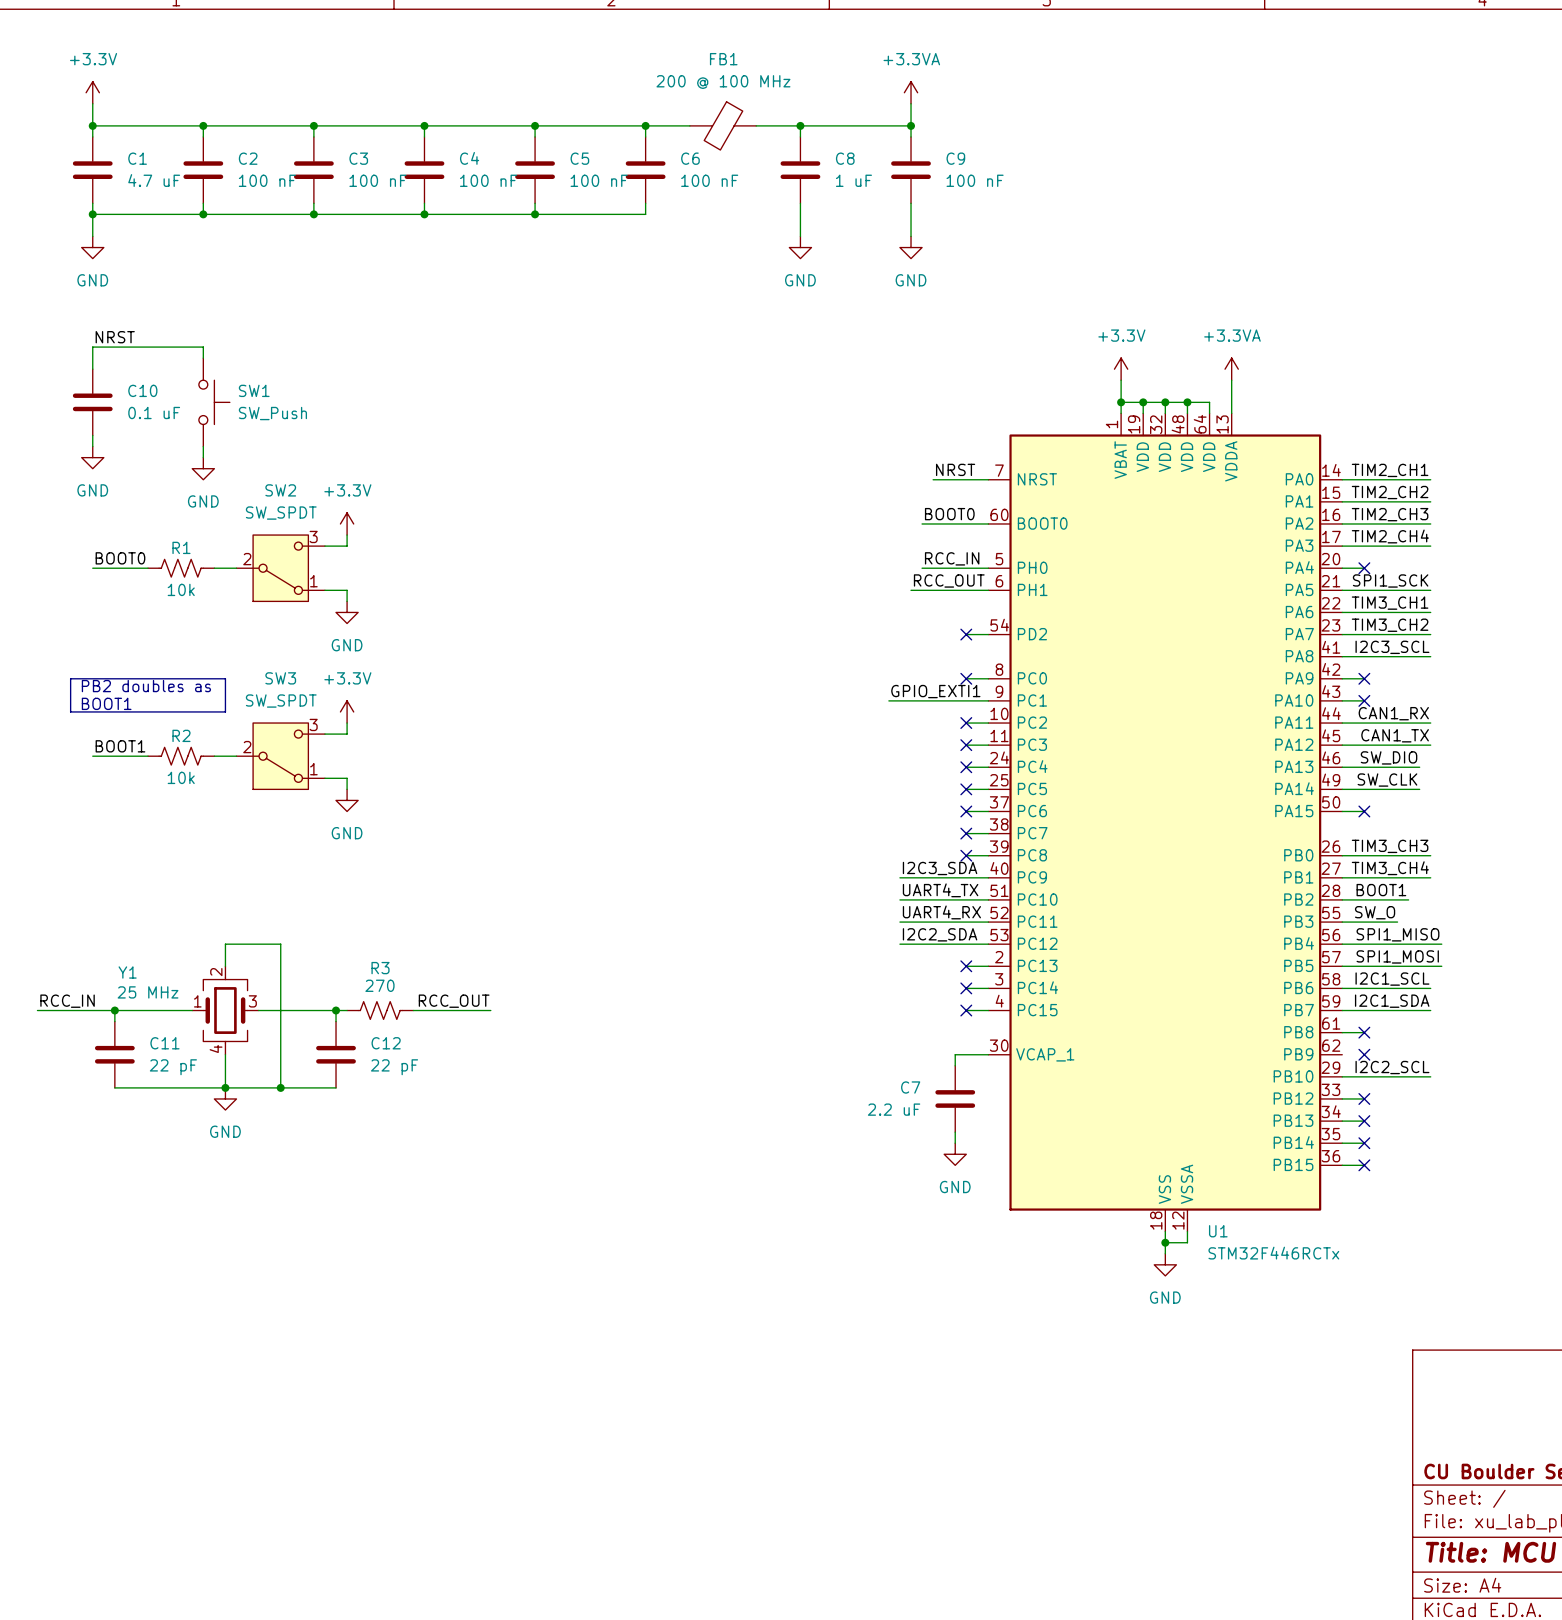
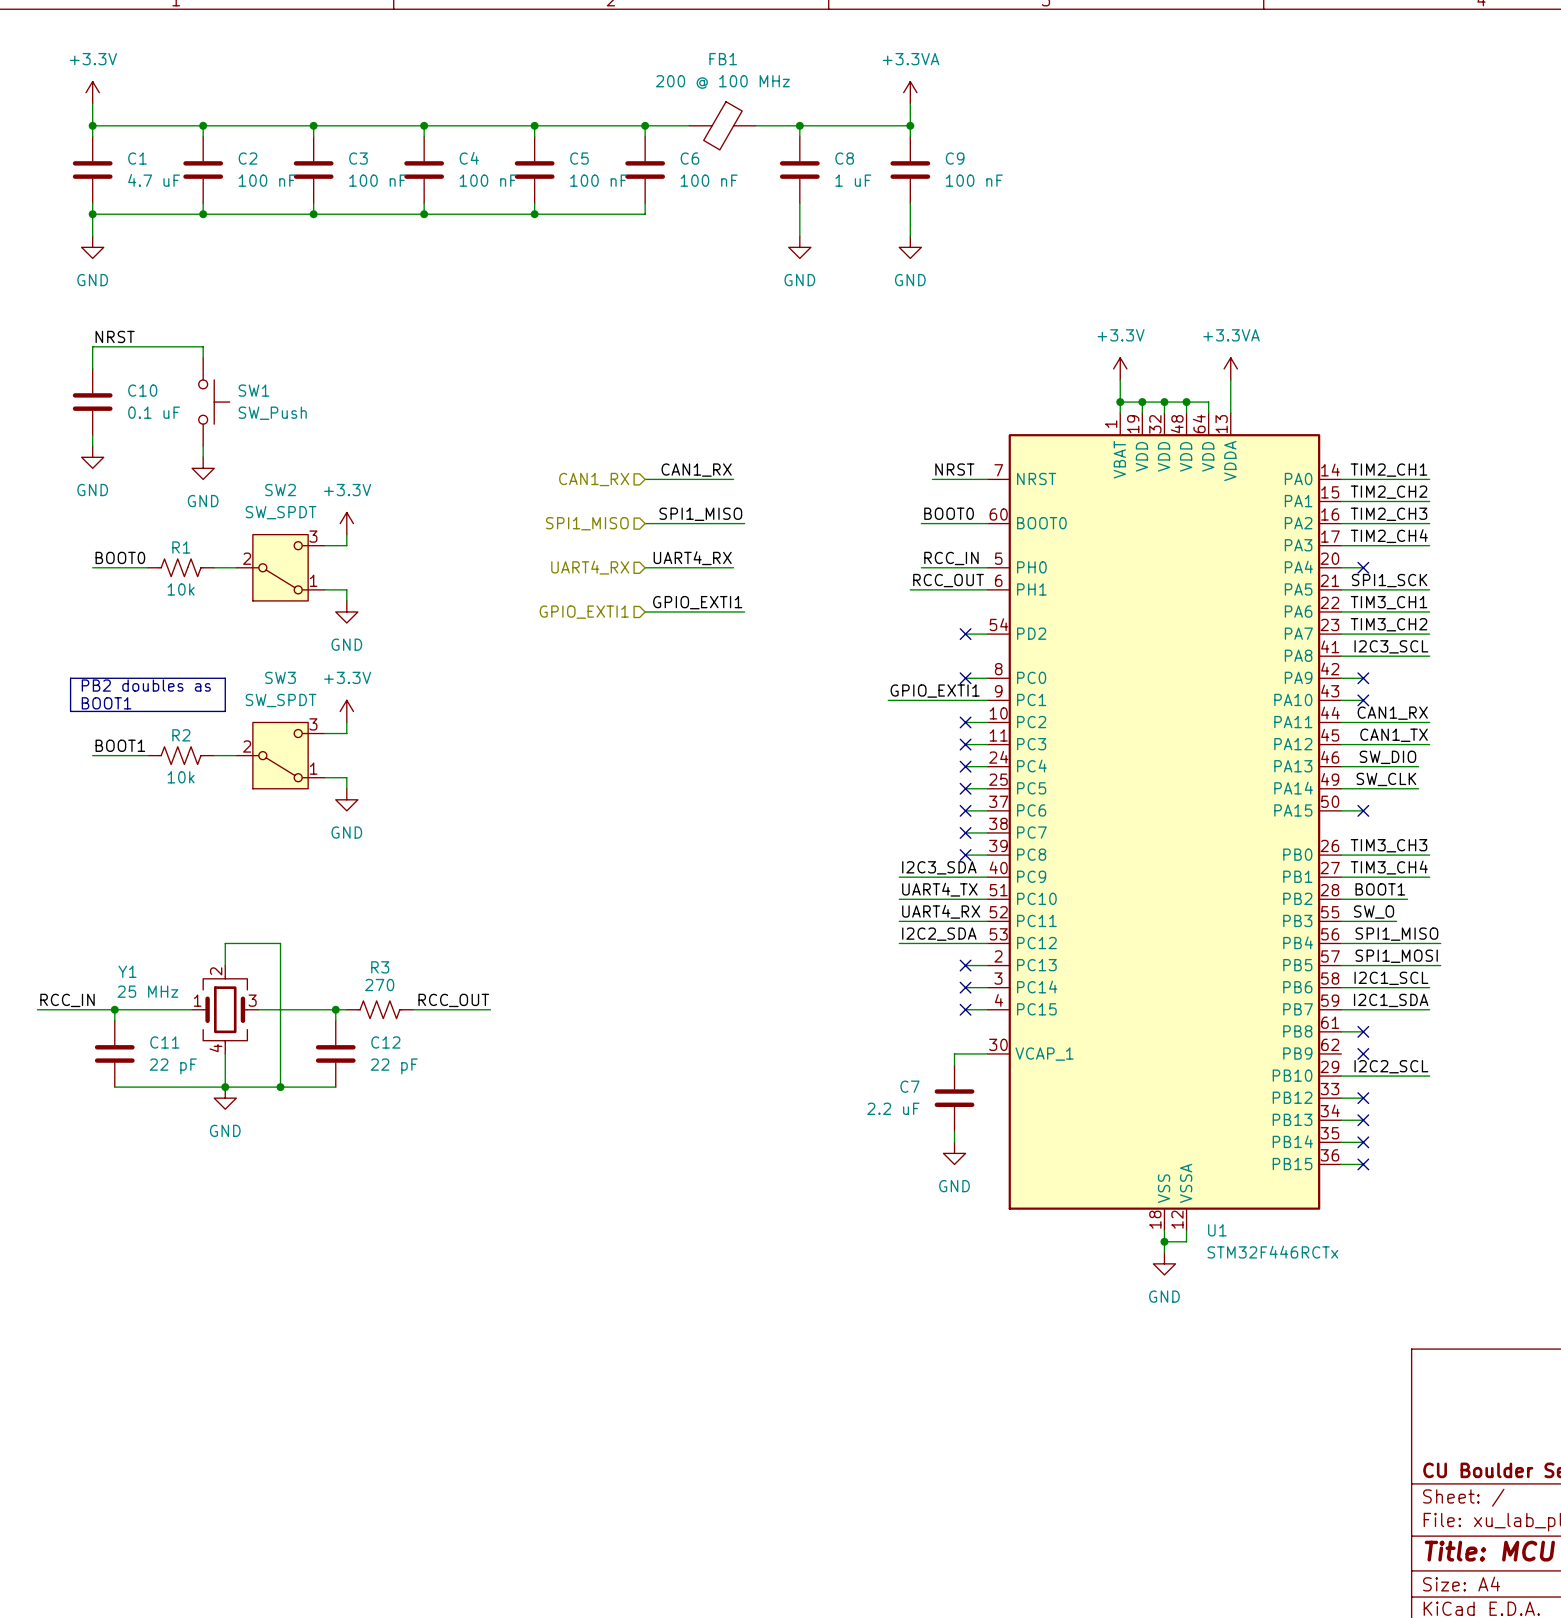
label: none -> CAN1_RX (696, 470)
hierarchical label: none -> CAN1_RX (594, 479)
wire: none -> (645, 479) (733, 479)
label: none -> SPI1_MISO (700, 514)
wire: none -> (645, 523) (744, 523)
hierarchical label: none -> SPI1_MISO (587, 523)
label: none -> UART4_RX (692, 558)
hierarchical label: none -> UART4_RX (590, 567)
wire: none -> (645, 567) (733, 567)
label: none -> GPIO_EXTI1 (697, 602)
hierarchical label: none -> GPIO_EXTI1 (584, 612)
wire: none -> (645, 611) (744, 611)

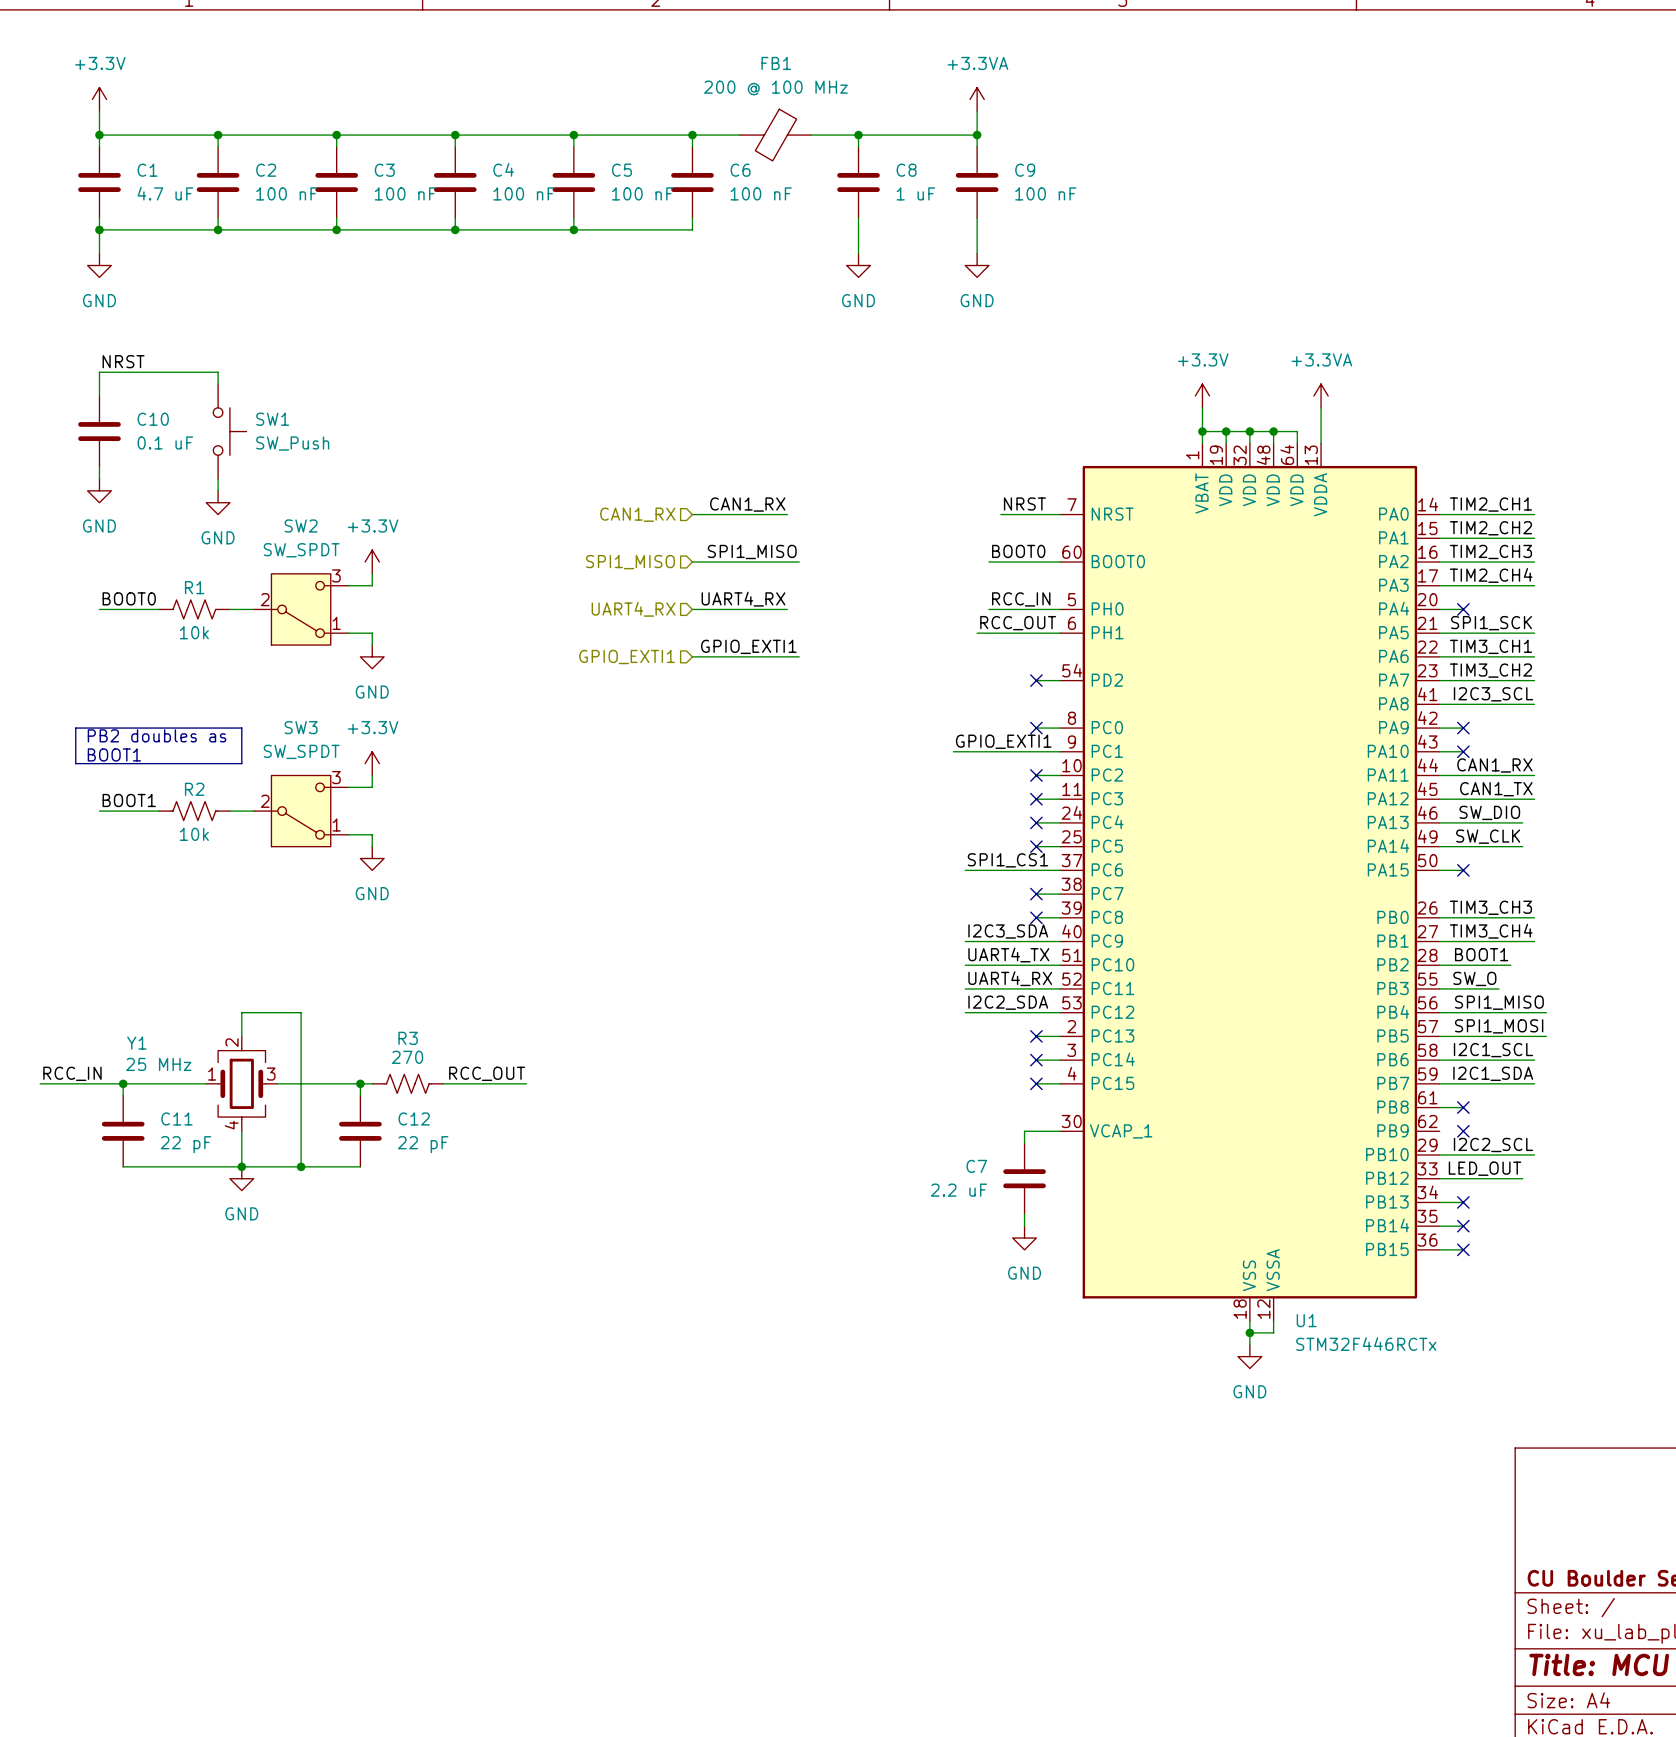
label: none -> SPI1_CS1 (1007, 860)
wire: none -> (965, 870) (1036, 870)
no-connect mark: (965, 810) -> none
label: none -> LED_OUT (1485, 1168)
wire: none -> (1463, 1178) (1522, 1178)
no-connect mark: (1363, 1098) -> none

